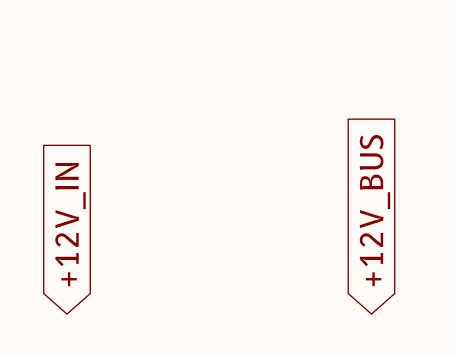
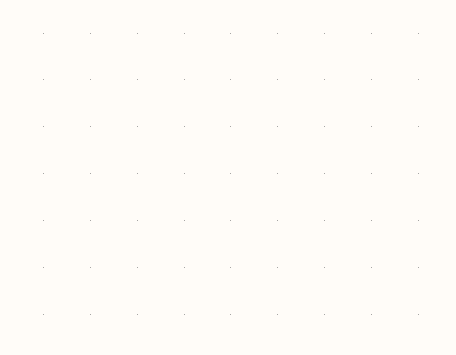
global label: +12V_BUS (374, 210) -> none
global label: +12V_IN (70, 224) -> none

